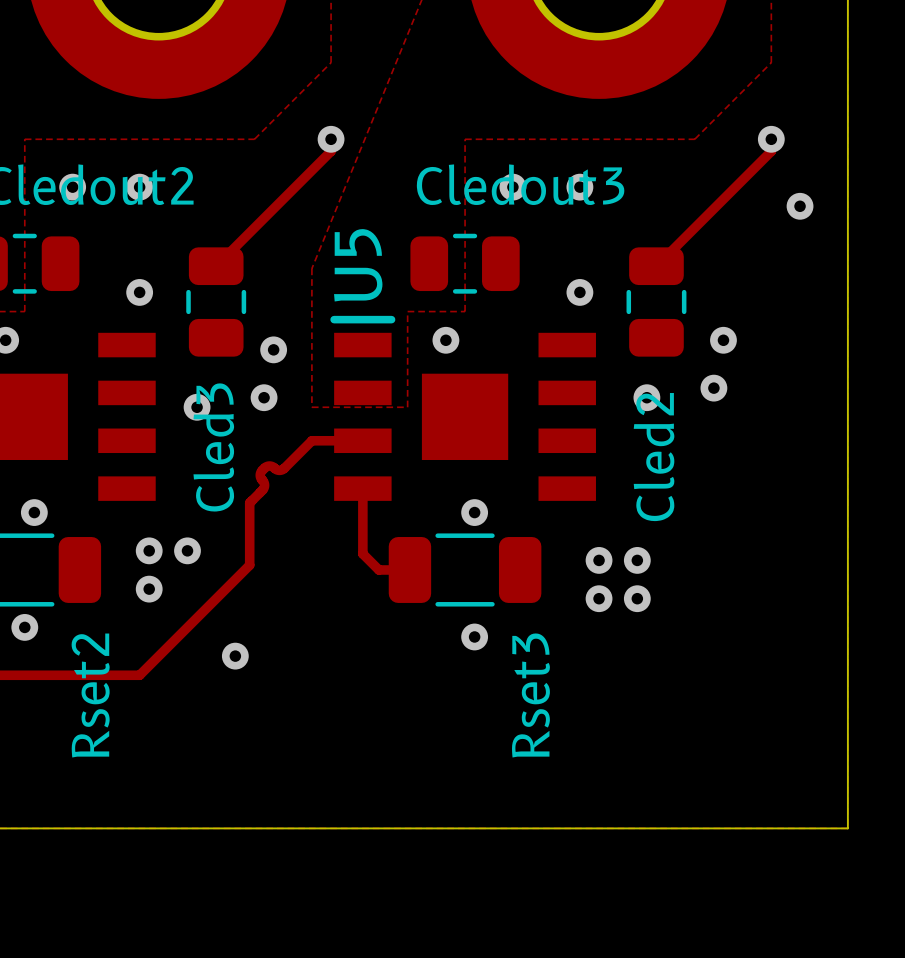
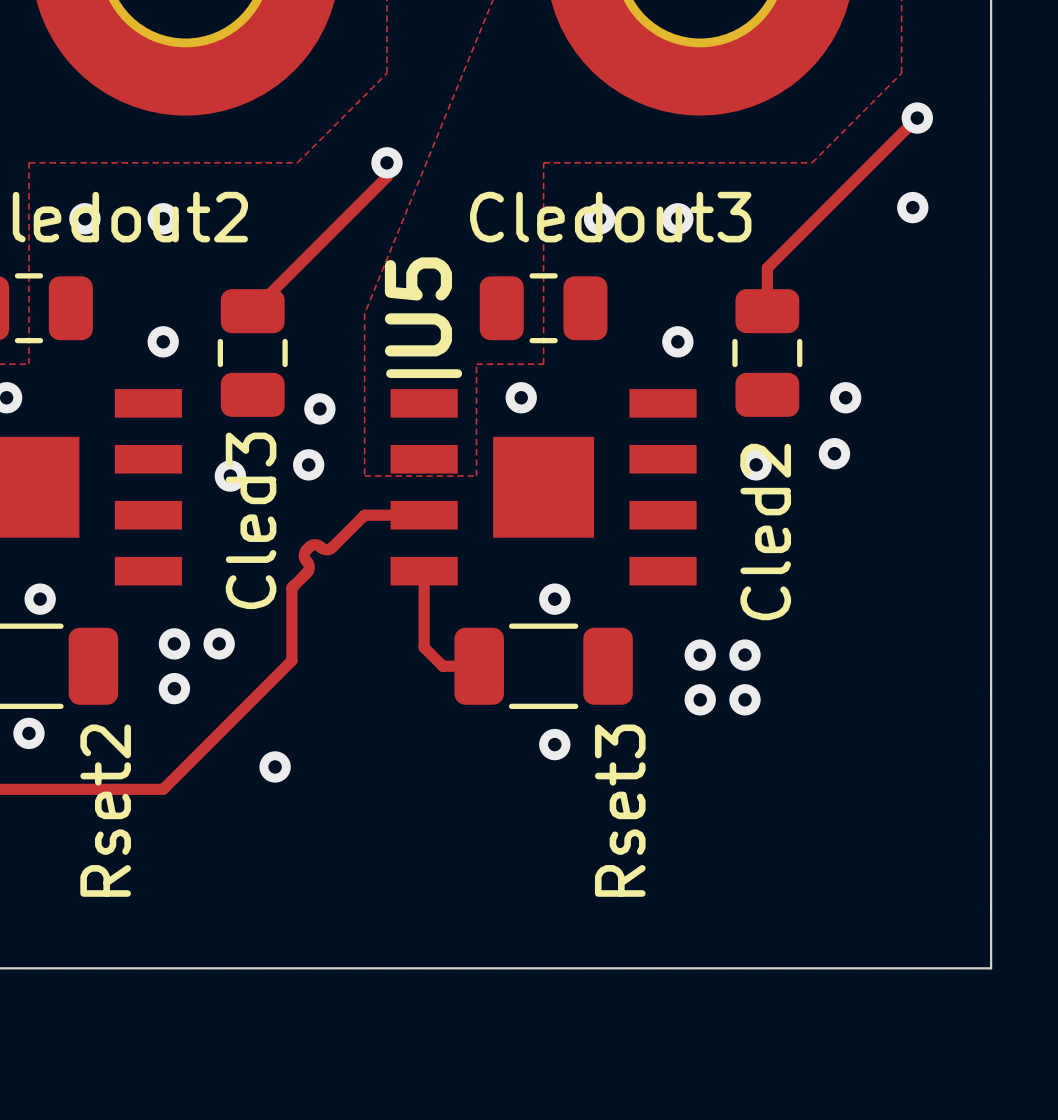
via: none -> (917, 118)
track: (771, 139) (771, 151) (656, 266) -> (917, 118) (767, 268) (767, 311)
via: (771, 139) -> none
via: none -> (912, 207)
via: (800, 206) -> none

